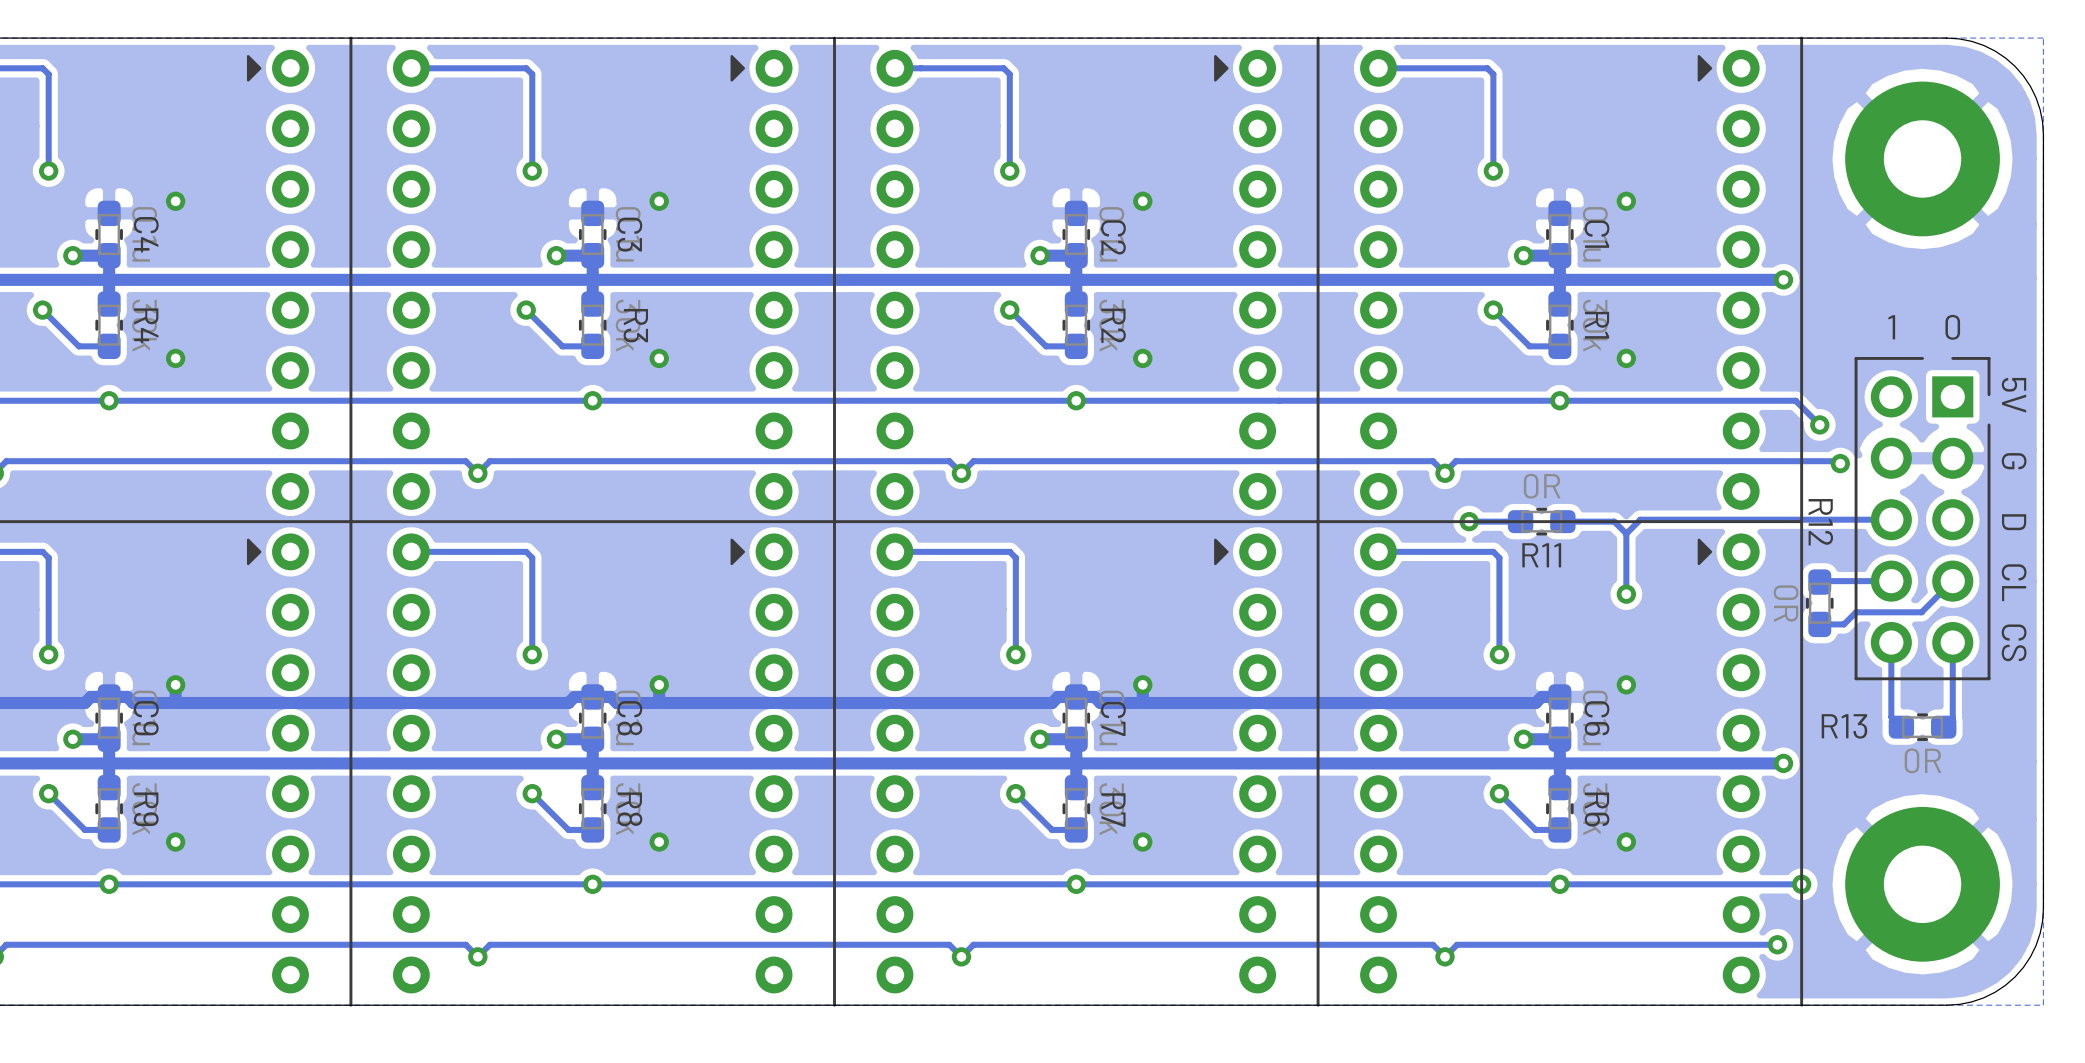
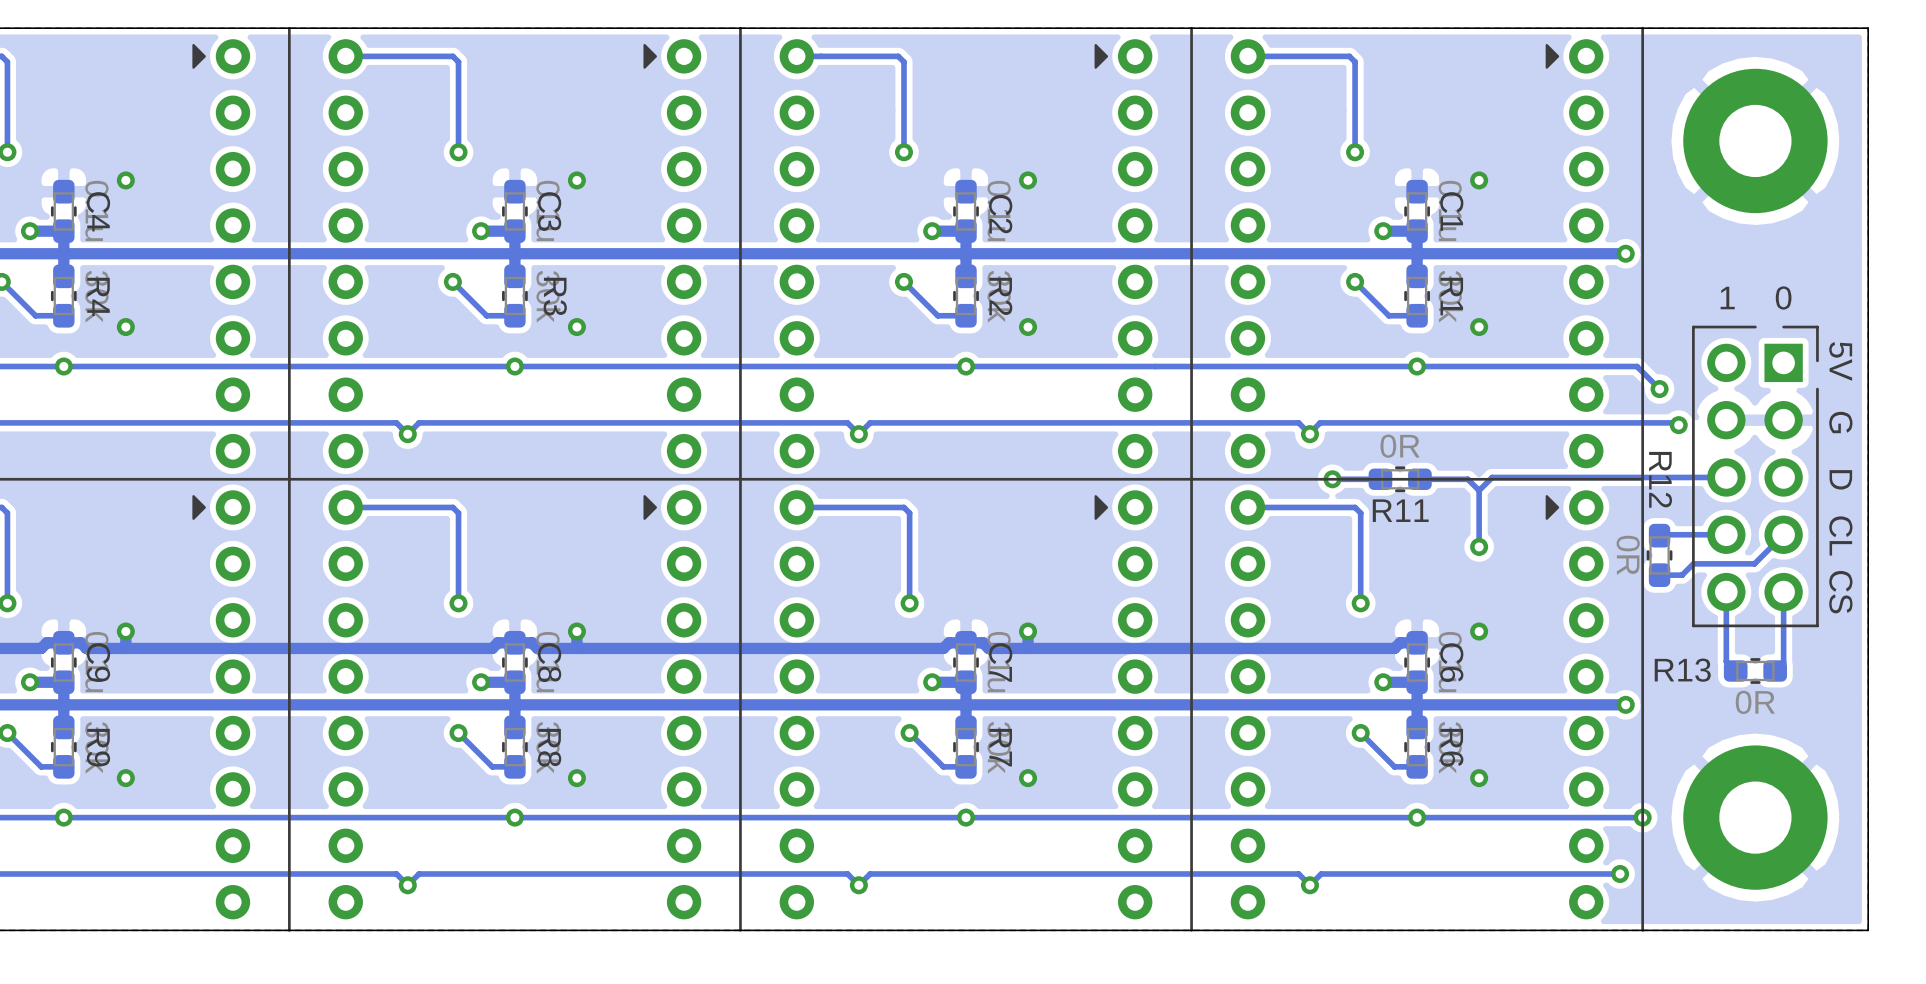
board edge: (1946, 38) (1959, 38) (1983, 45) (1995, 51) (2015, 66) (2023, 75) (2036, 97) (2040, 109) (2043, 134) -> (1777, 28) (1868, 28) (1868, 118)
board edge: (2043, 908) (2040, 933) (2036, 945) (2030, 956) (2015, 976) (2005, 985) (1983, 997) (1971, 1001) (1946, 1005) -> (1868, 840) (1868, 930) (1777, 930)

